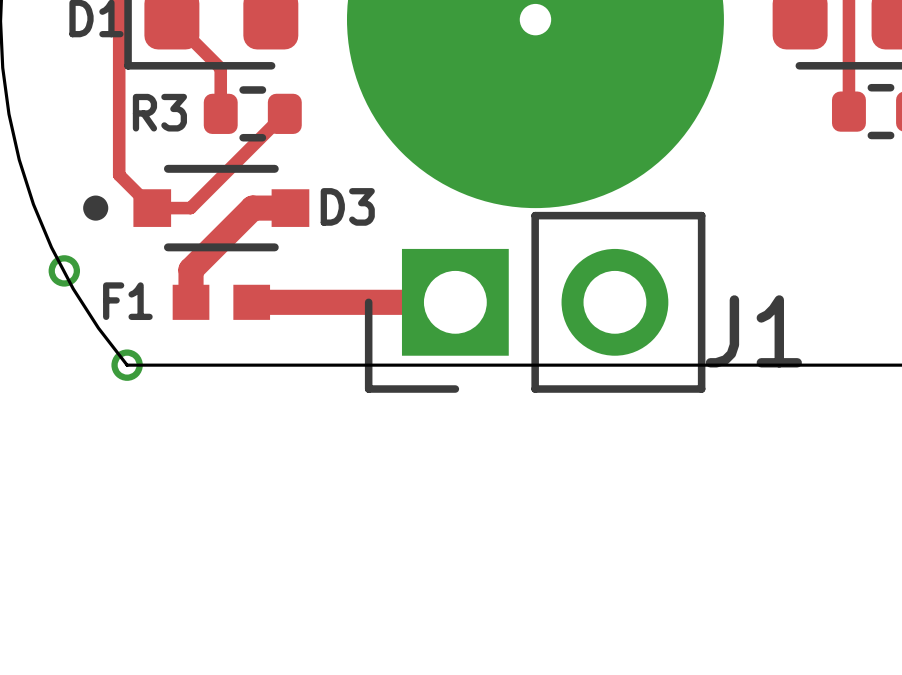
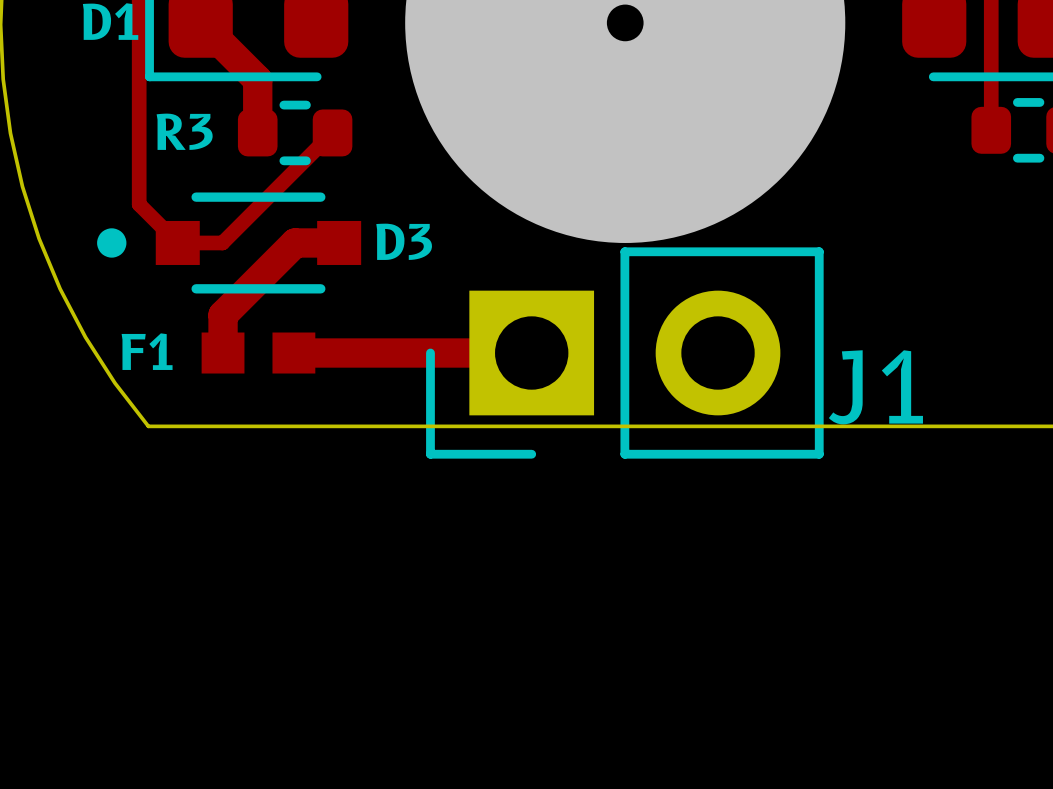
top track width: thin (171, 19) (220, 68) (220, 113) -> thick (200, 22) (257, 79) (257, 132)
via: (64, 270) -> none
via: (127, 365) -> none

